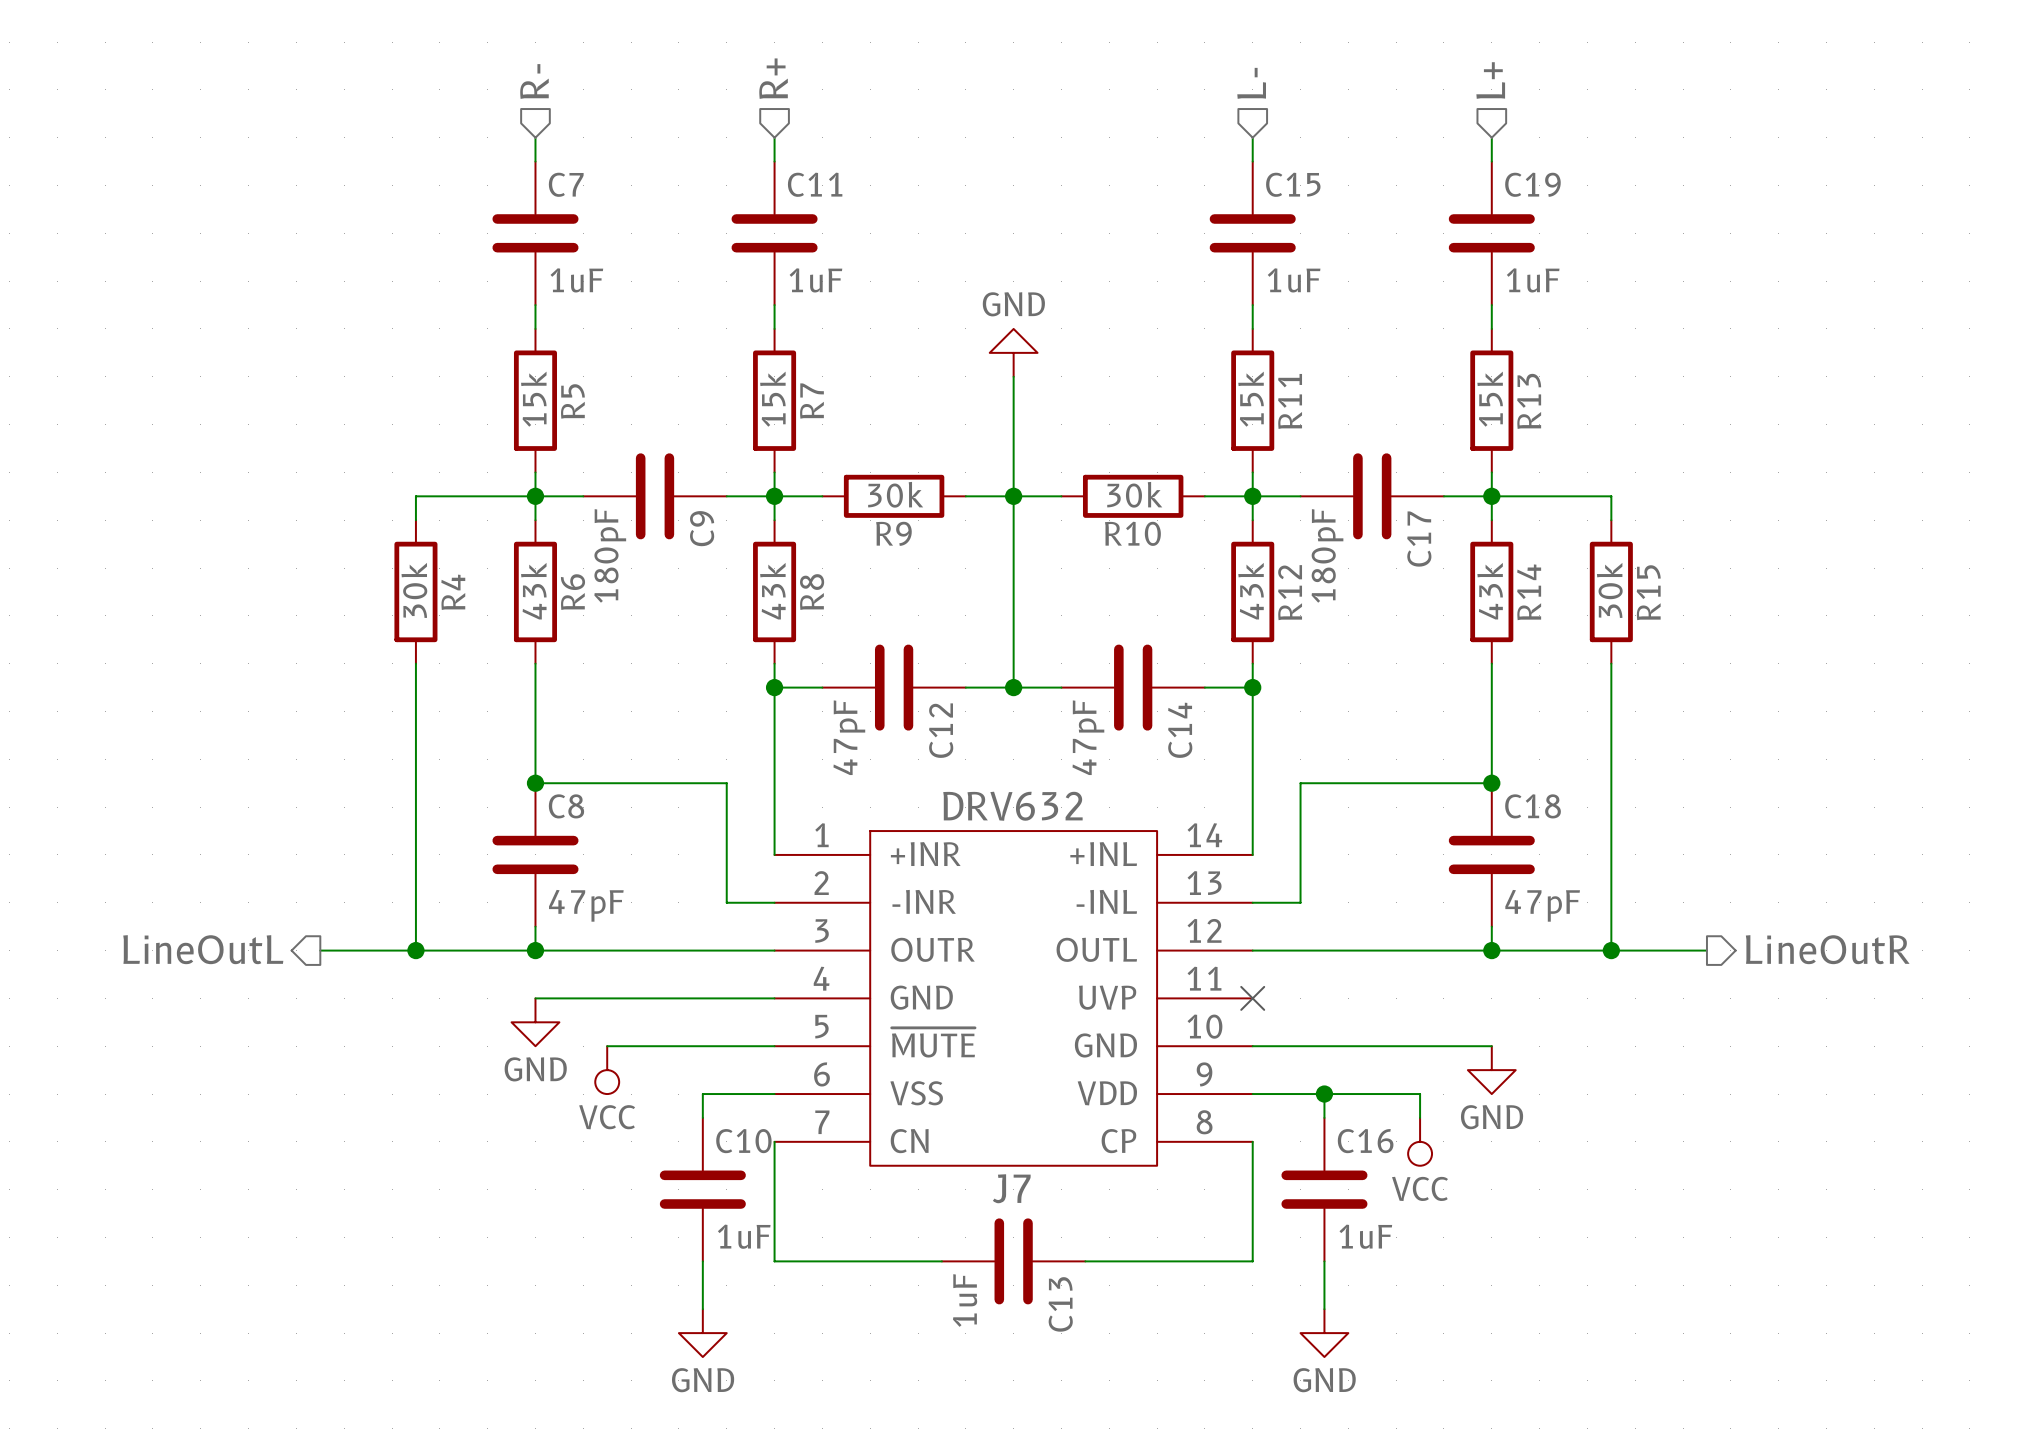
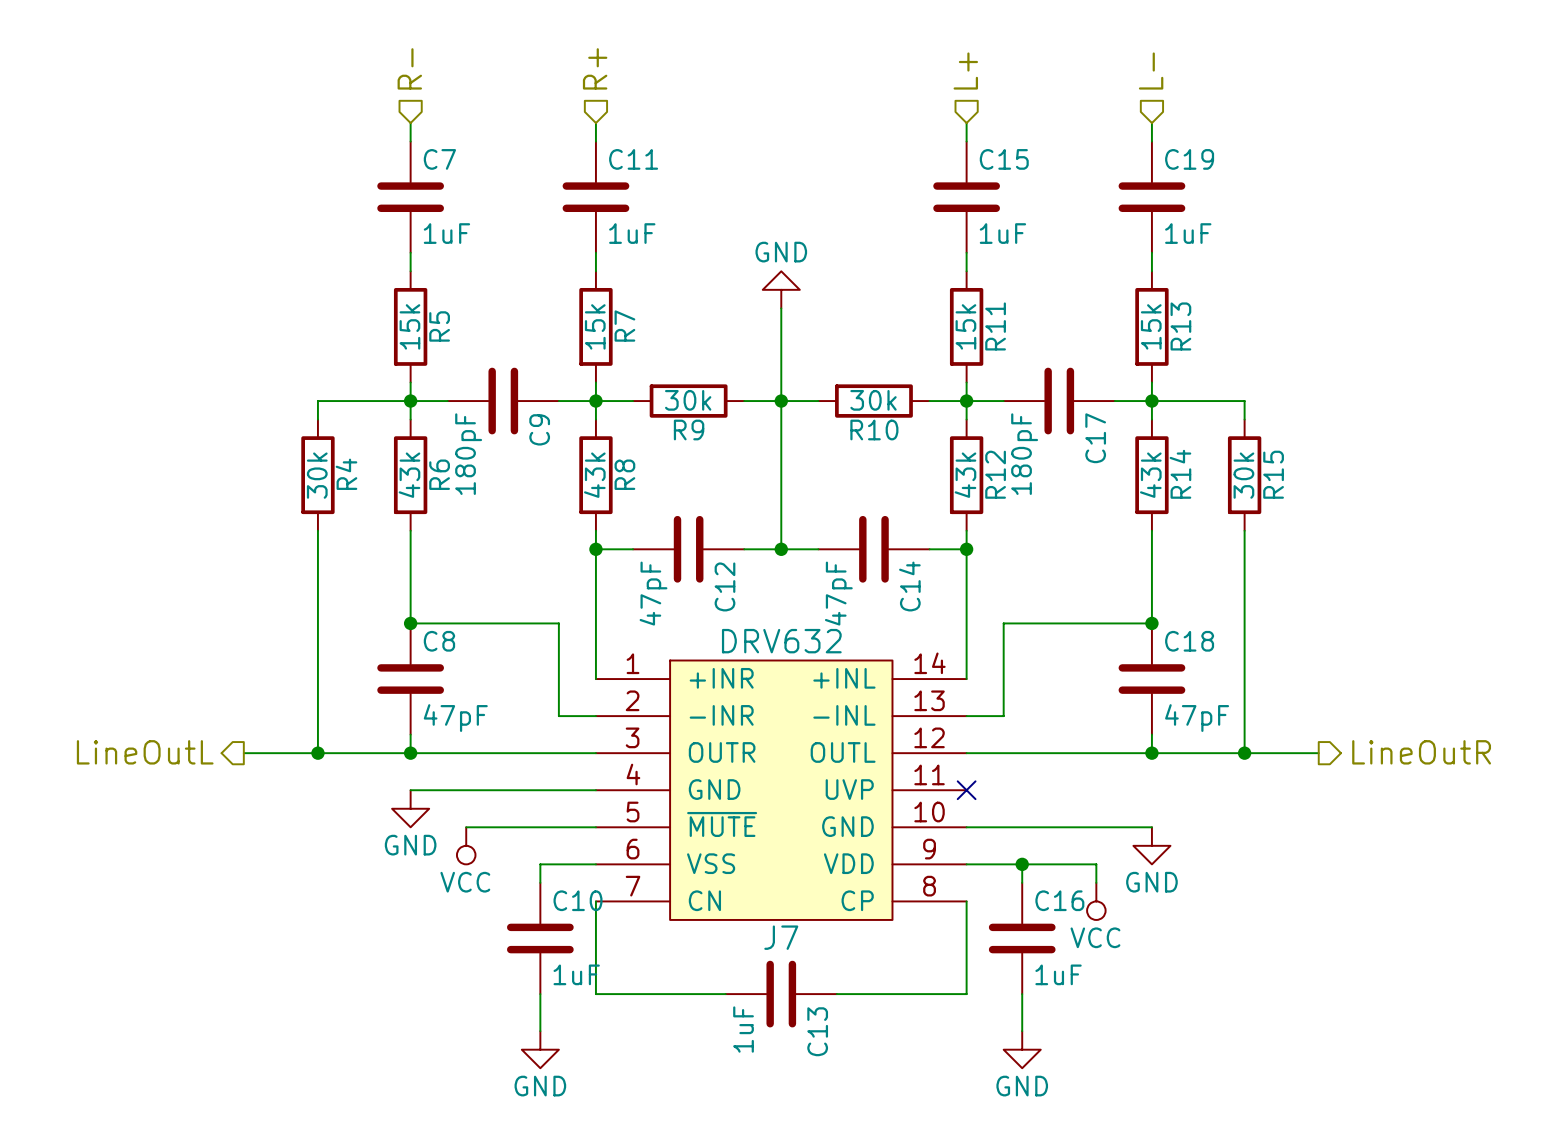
hierarchical label: L+ (1490, 80) -> L- (1151, 71)
hierarchical label: L- (1251, 83) -> L+ (965, 71)

